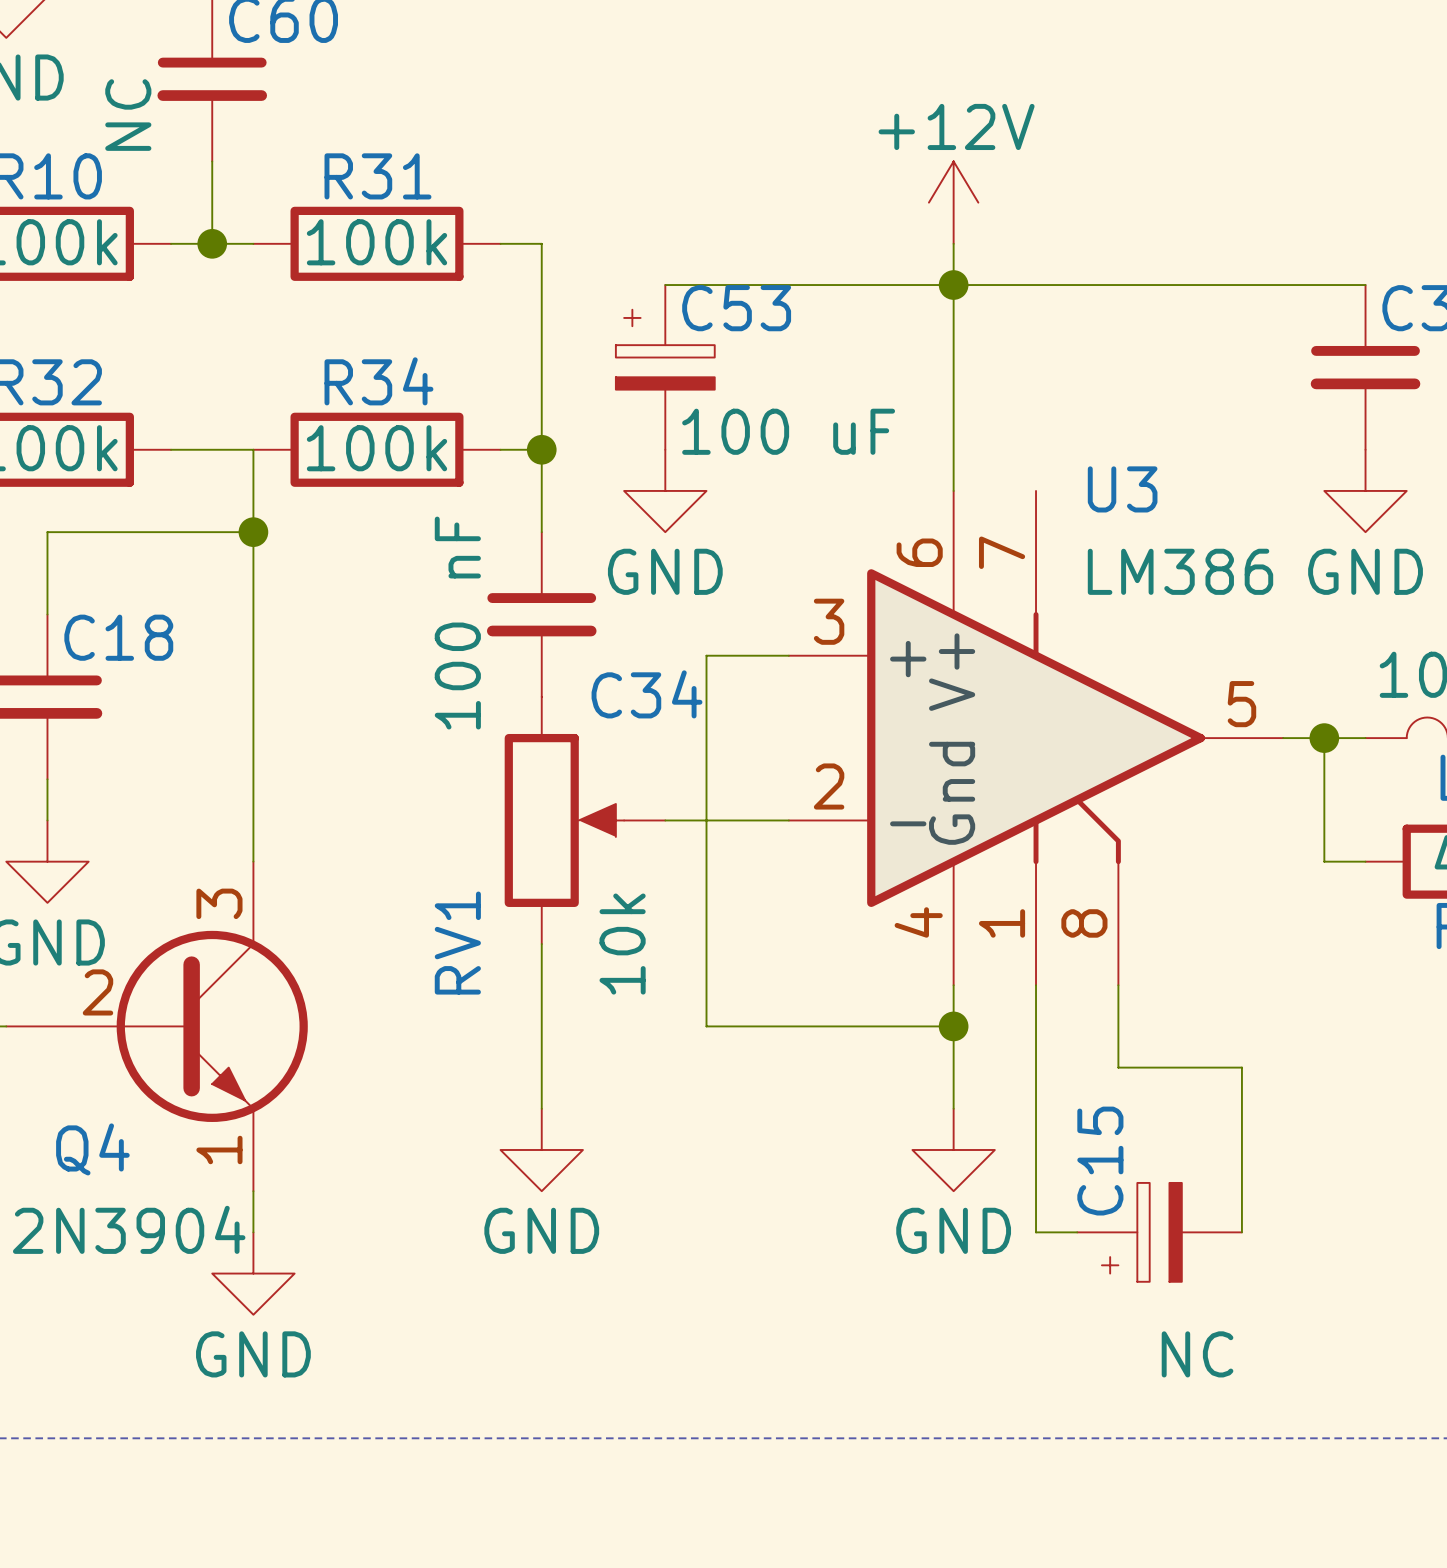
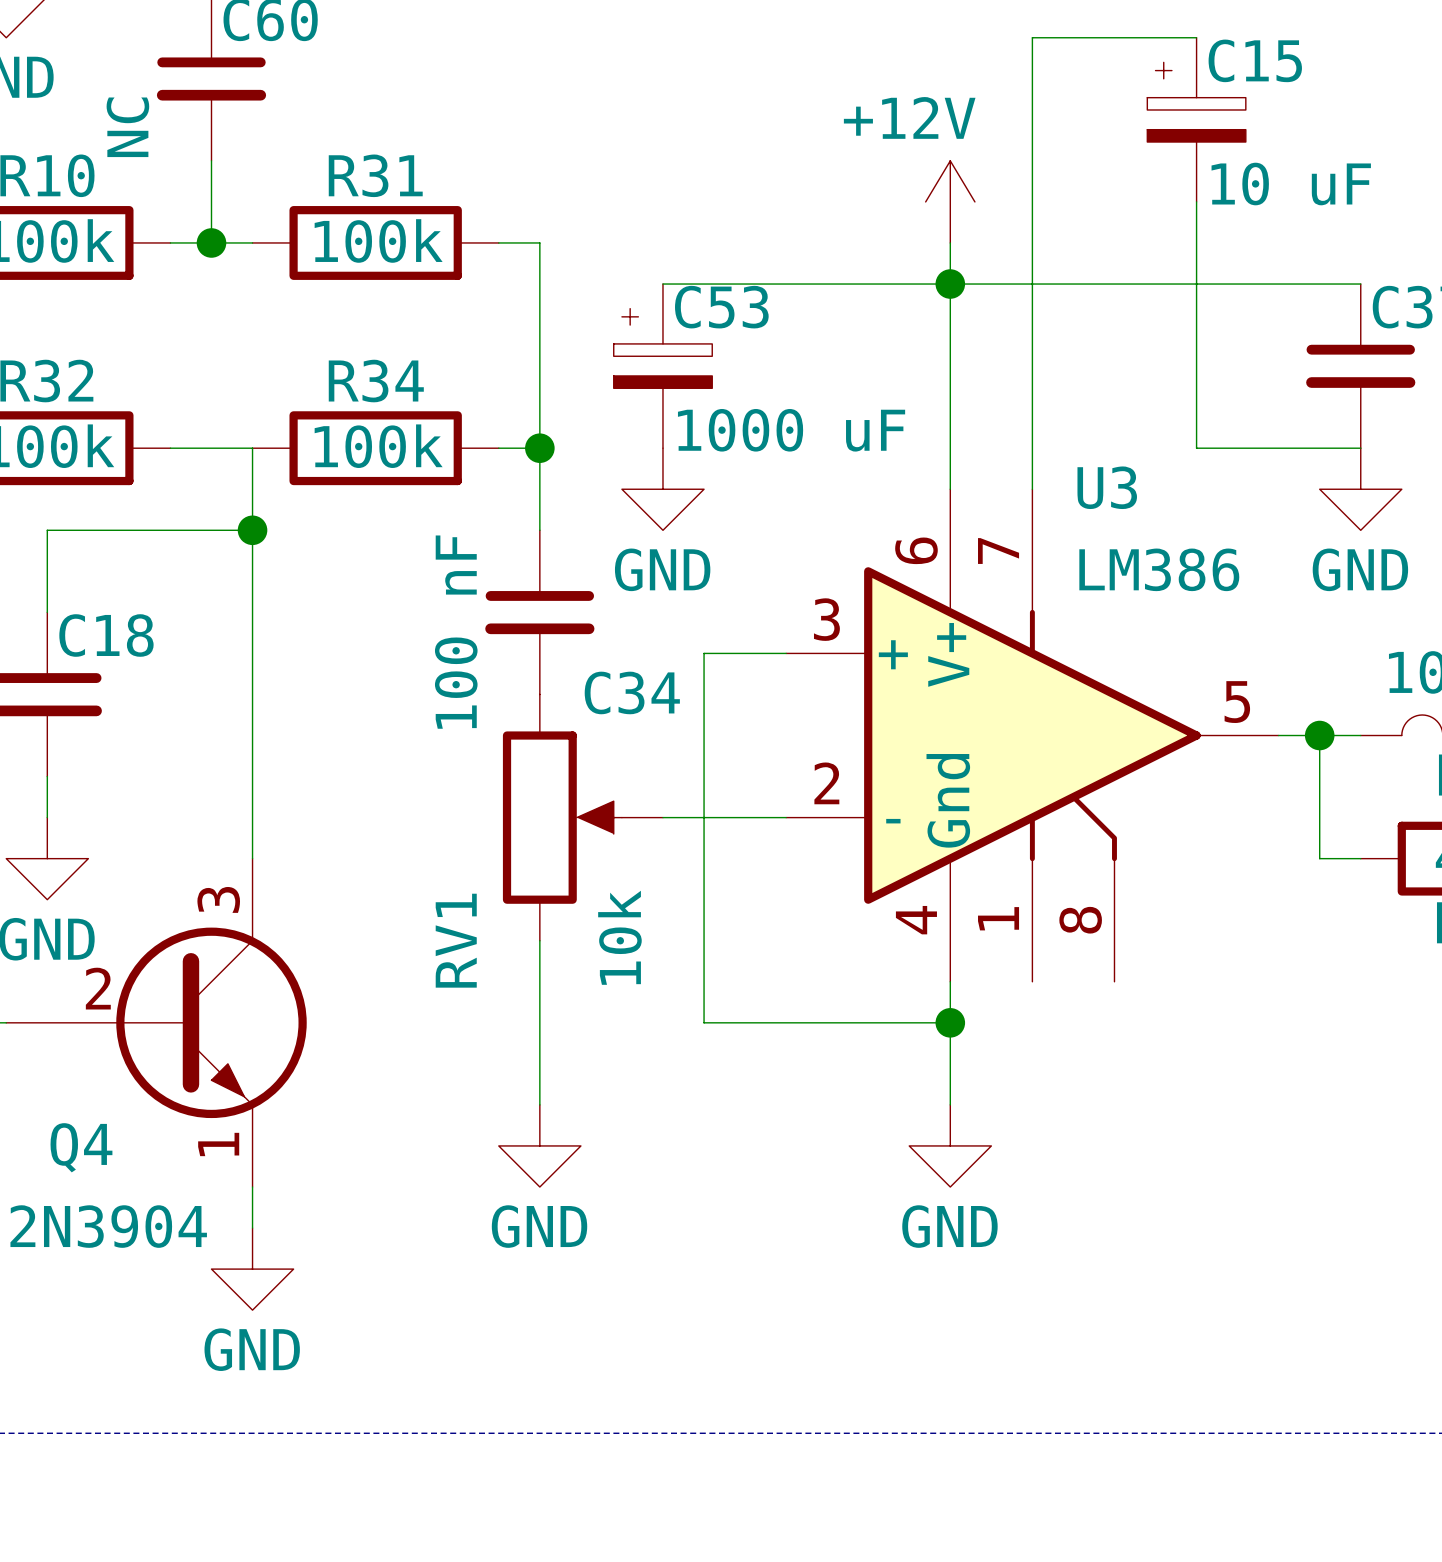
wire: none -> (1196, 37) (1032, 37) (1032, 489)
power symbol text position: +12V (956, 126) -> +12V (909, 117)
wire: none -> (1196, 201) (1196, 448) (1360, 448)
C53 value: 100 uF (788, 431) -> 1000 uF (791, 430)
wire: (1036, 985) (1036, 1232) (1077, 1232) -> none
wire: (1118, 985) (1118, 1067) (1241, 1067) (1241, 1232) -> none
C15 rotation: 0° (1141, 1232) -> 90° clockwise (1196, 102)
C15 position: (1159, 1232) -> (1196, 119)
C15 value: NC (1197, 1354) -> 10 uF (1291, 184)

